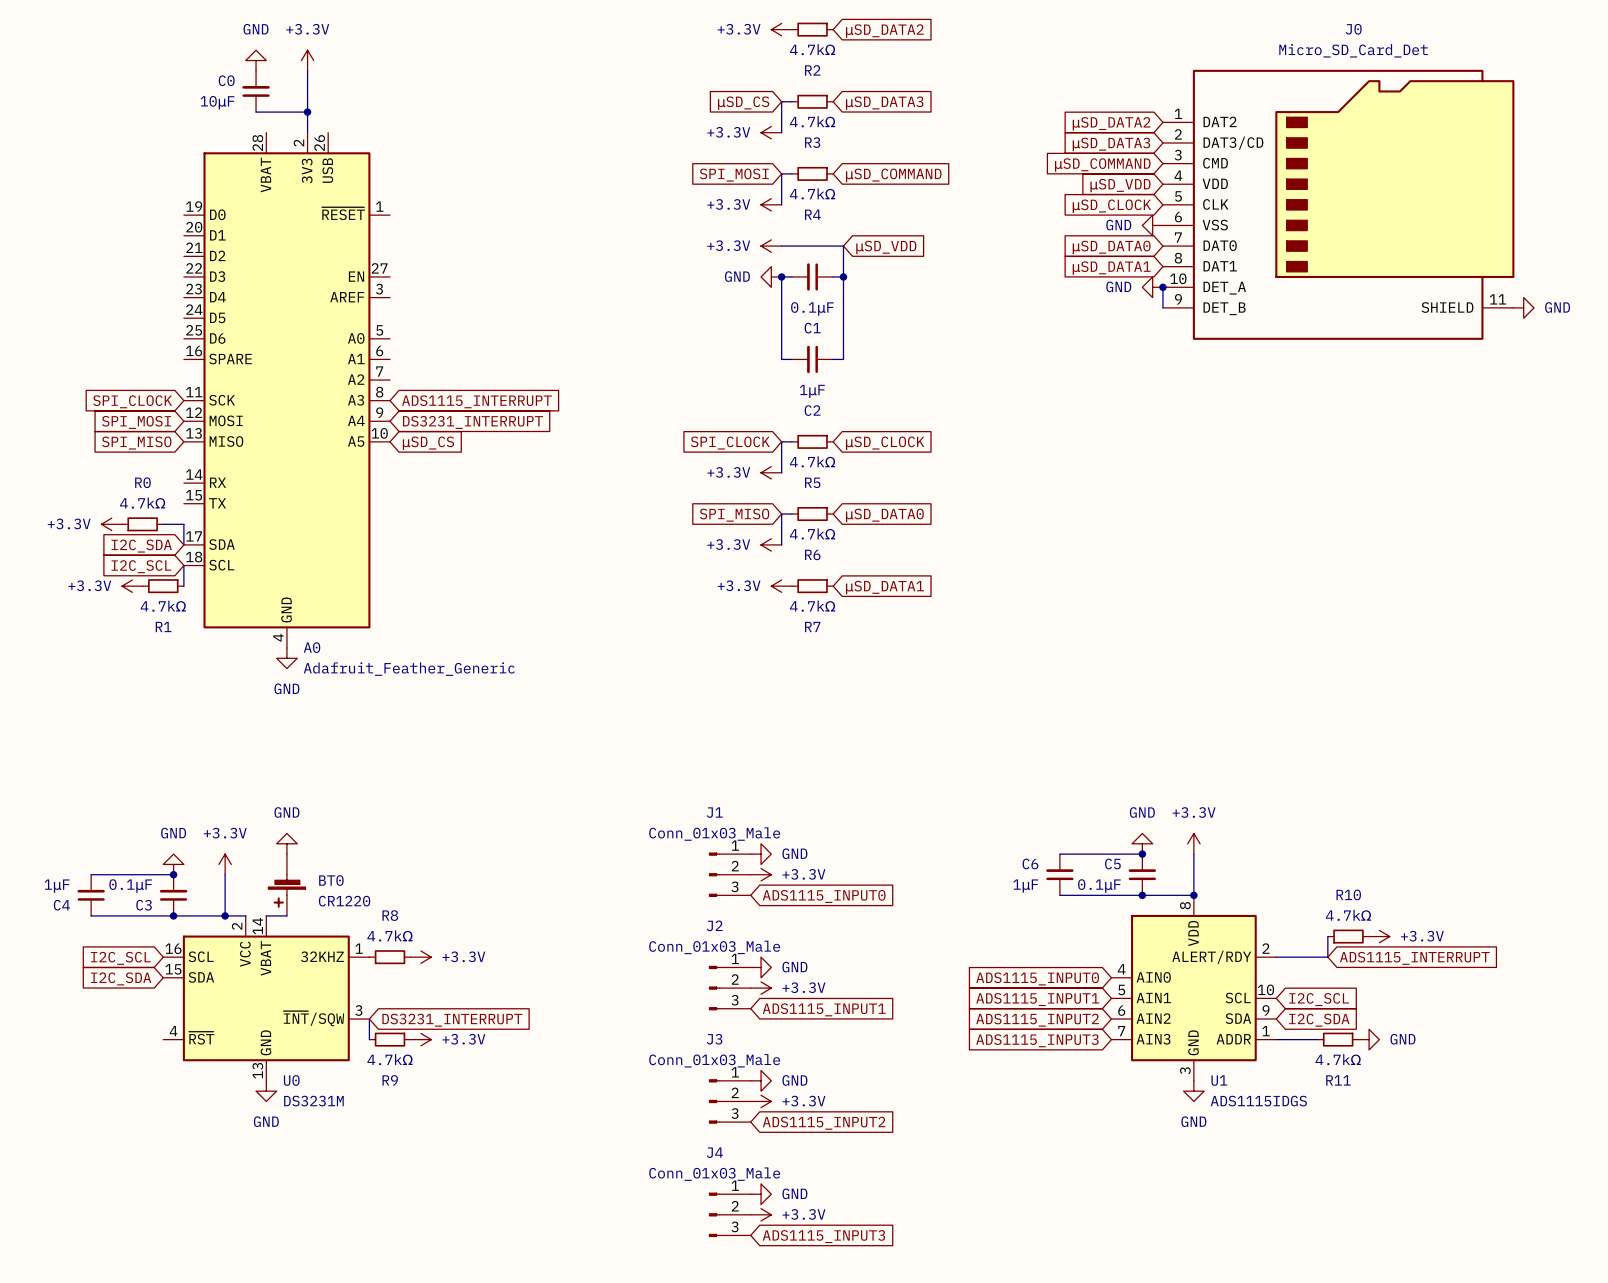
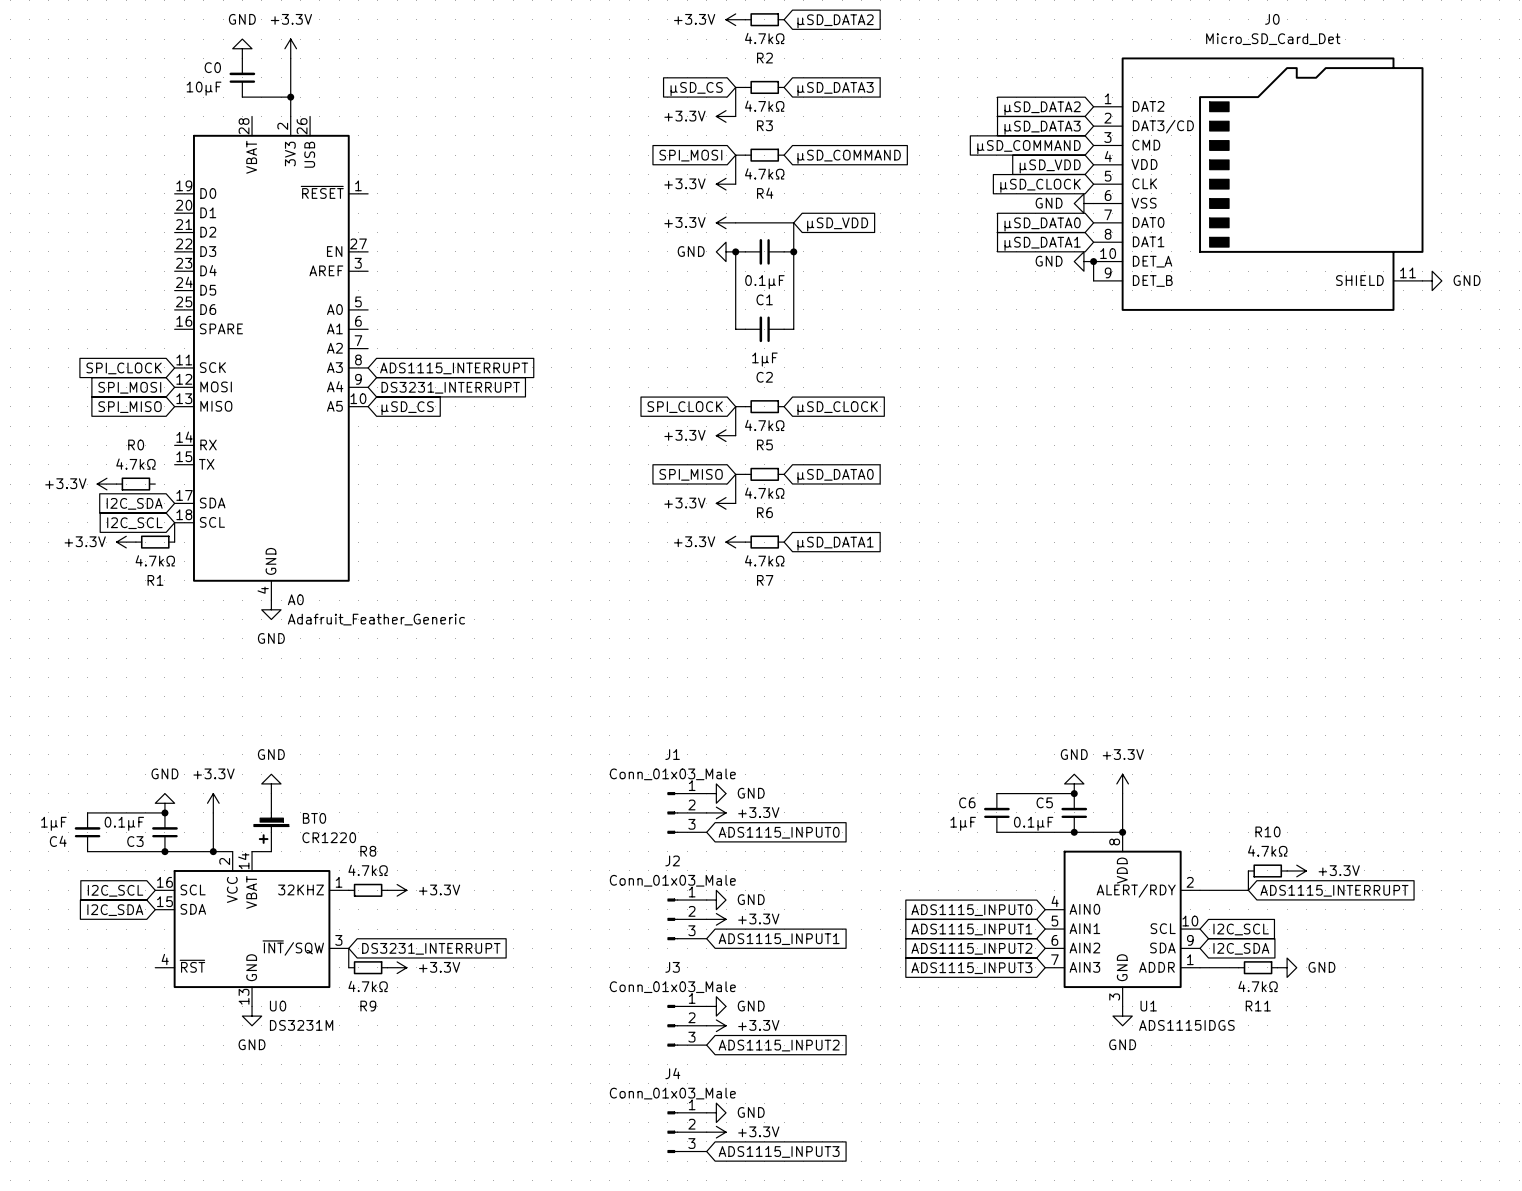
wire: (163, 524) (183, 524) (183, 544) -> none

